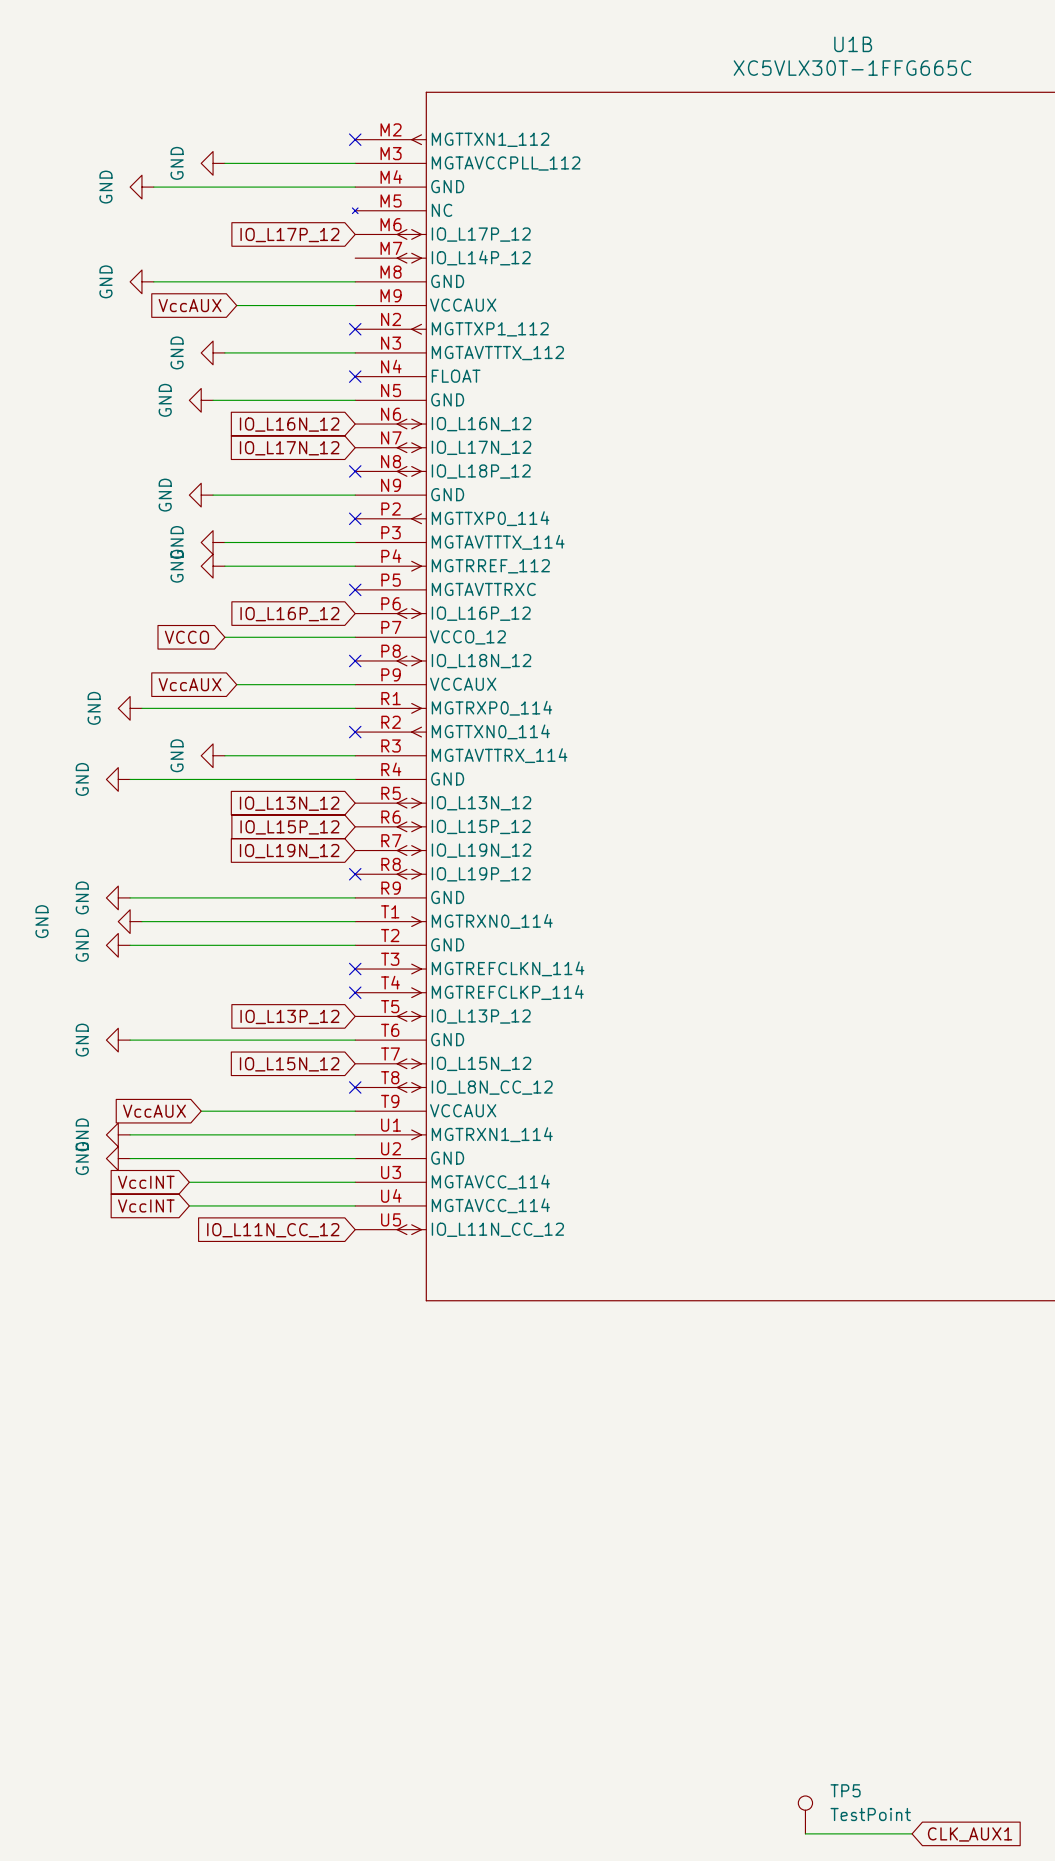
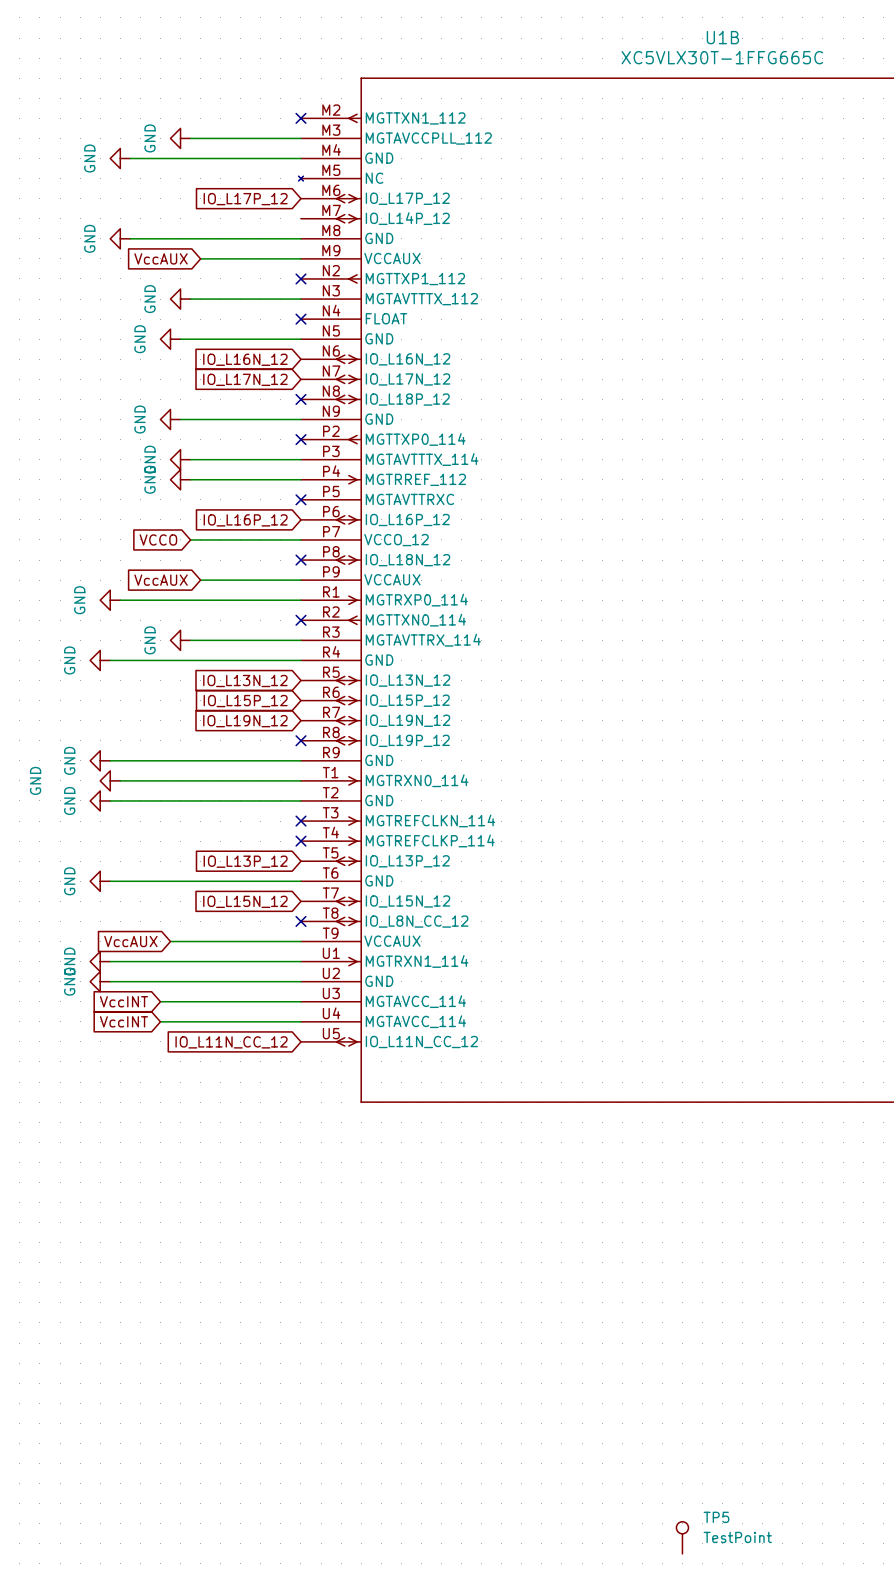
wire: (805, 1833) (912, 1833) -> none
global label: CLK_AUX1 (970, 1834) -> none

